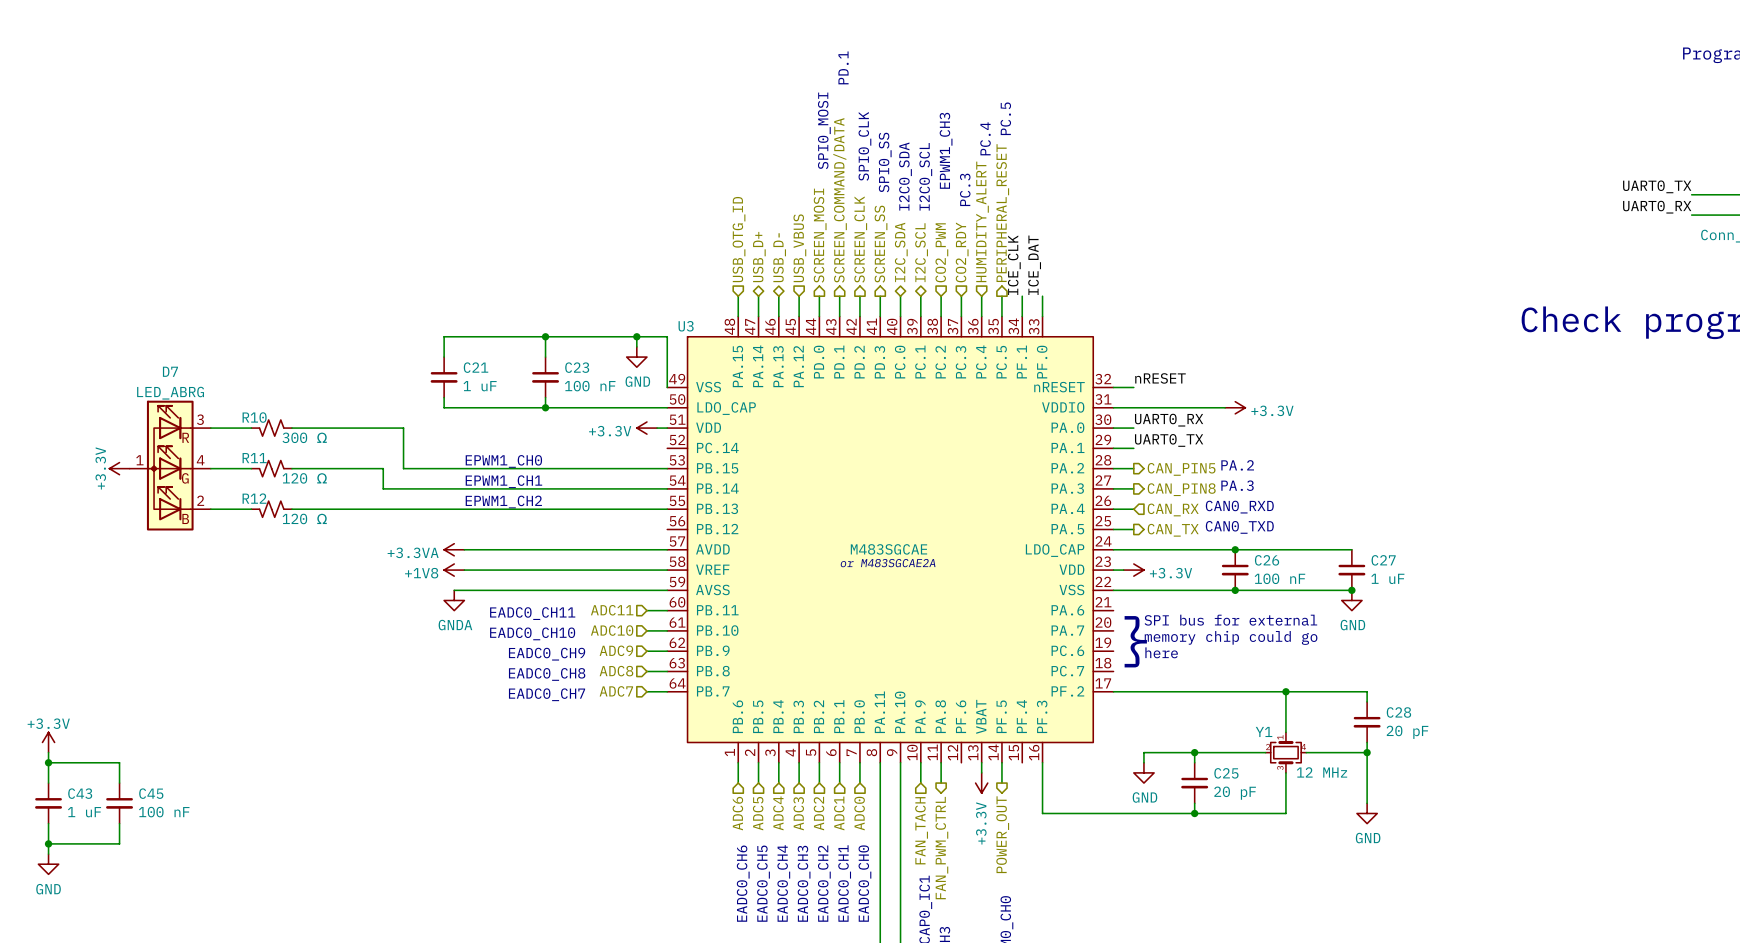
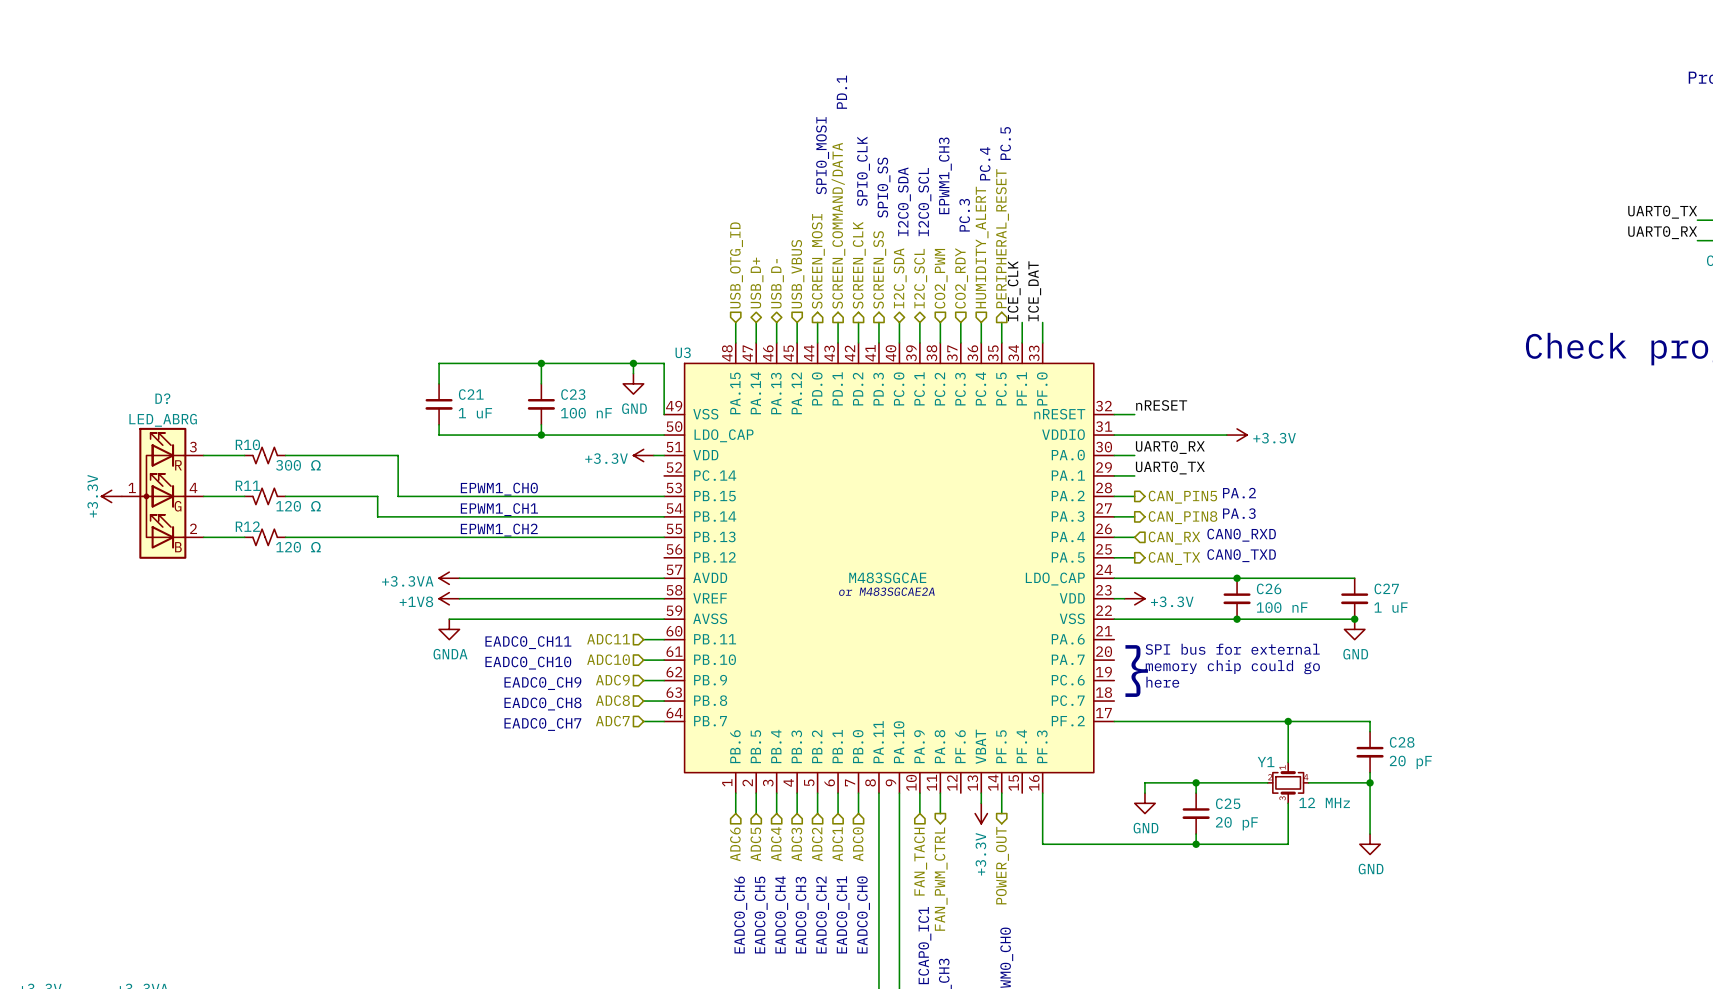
D7 name: D7 (170, 371) -> D? (162, 398)
power symbol: +3.3V (48, 742) -> none
wire: (48, 752) (48, 783) -> none
wire: (48, 762) (119, 762) (119, 783) -> none
junction: (48, 762) -> none
C43: 1 uF (48, 803) -> none
C45: 100 nF (119, 803) -> none
wire: (48, 823) (48, 854) -> none
wire: (119, 823) (119, 843) (48, 843) -> none
junction: (48, 843) -> none
power symbol: GND (48, 864) -> none

